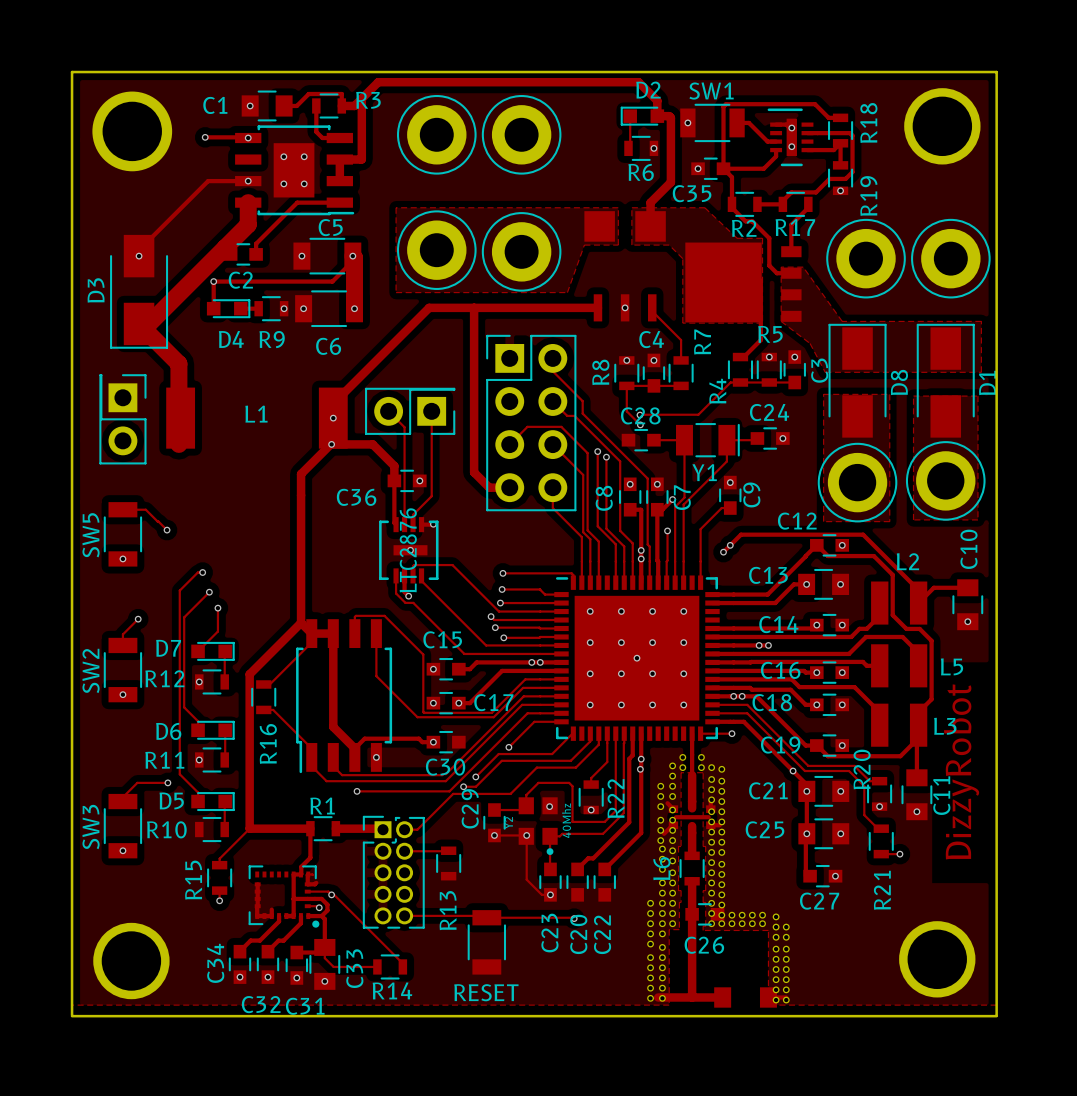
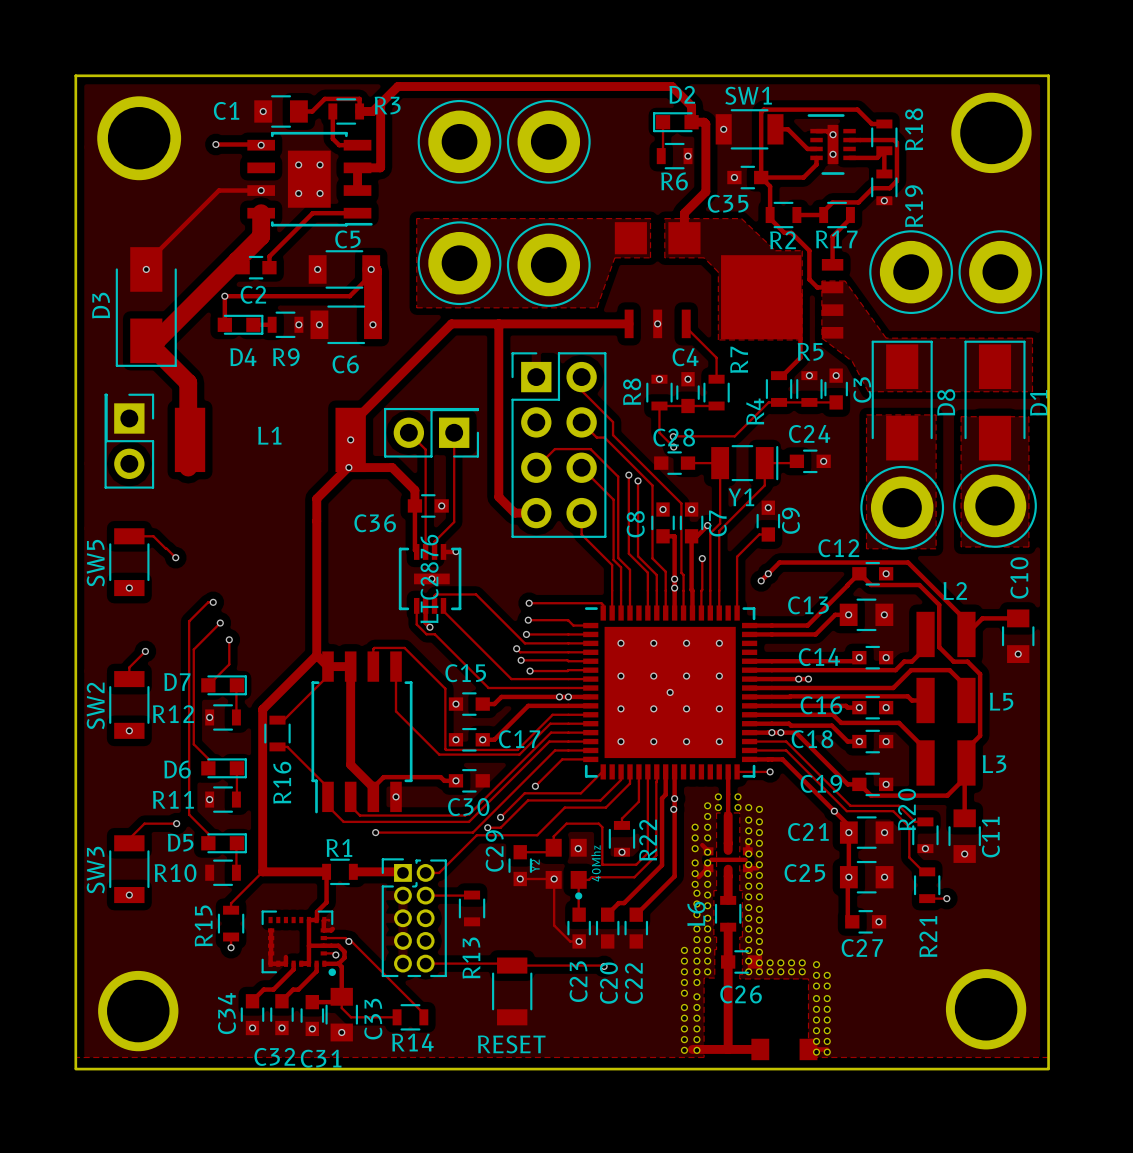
text: DizzyRobot (961, 771) -> none

